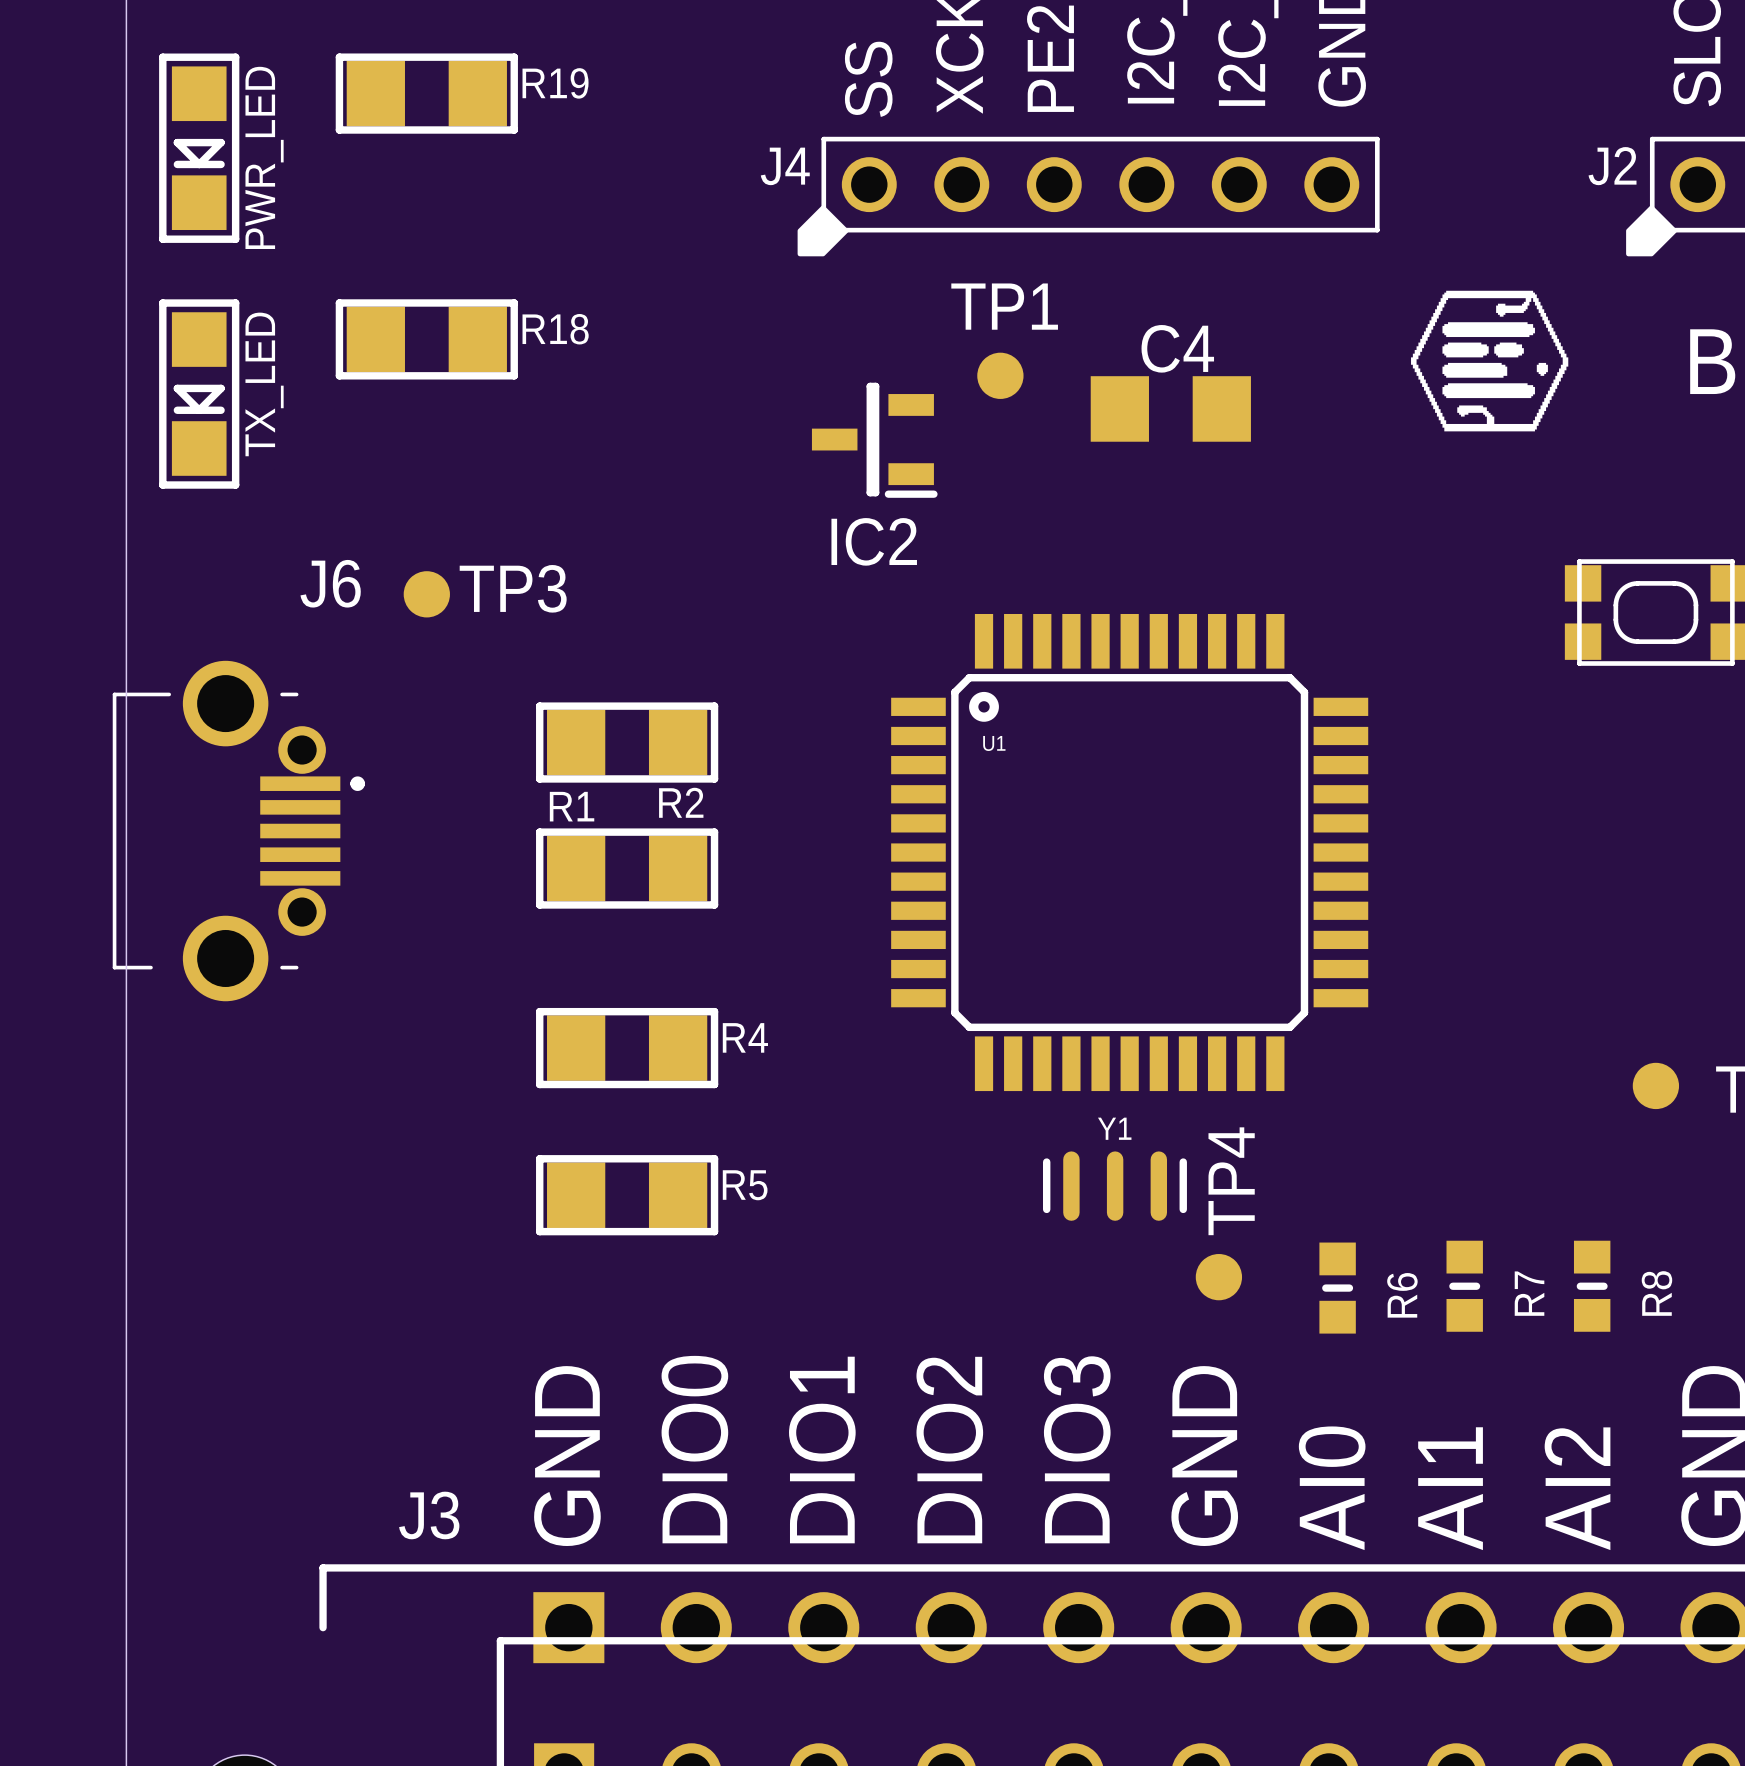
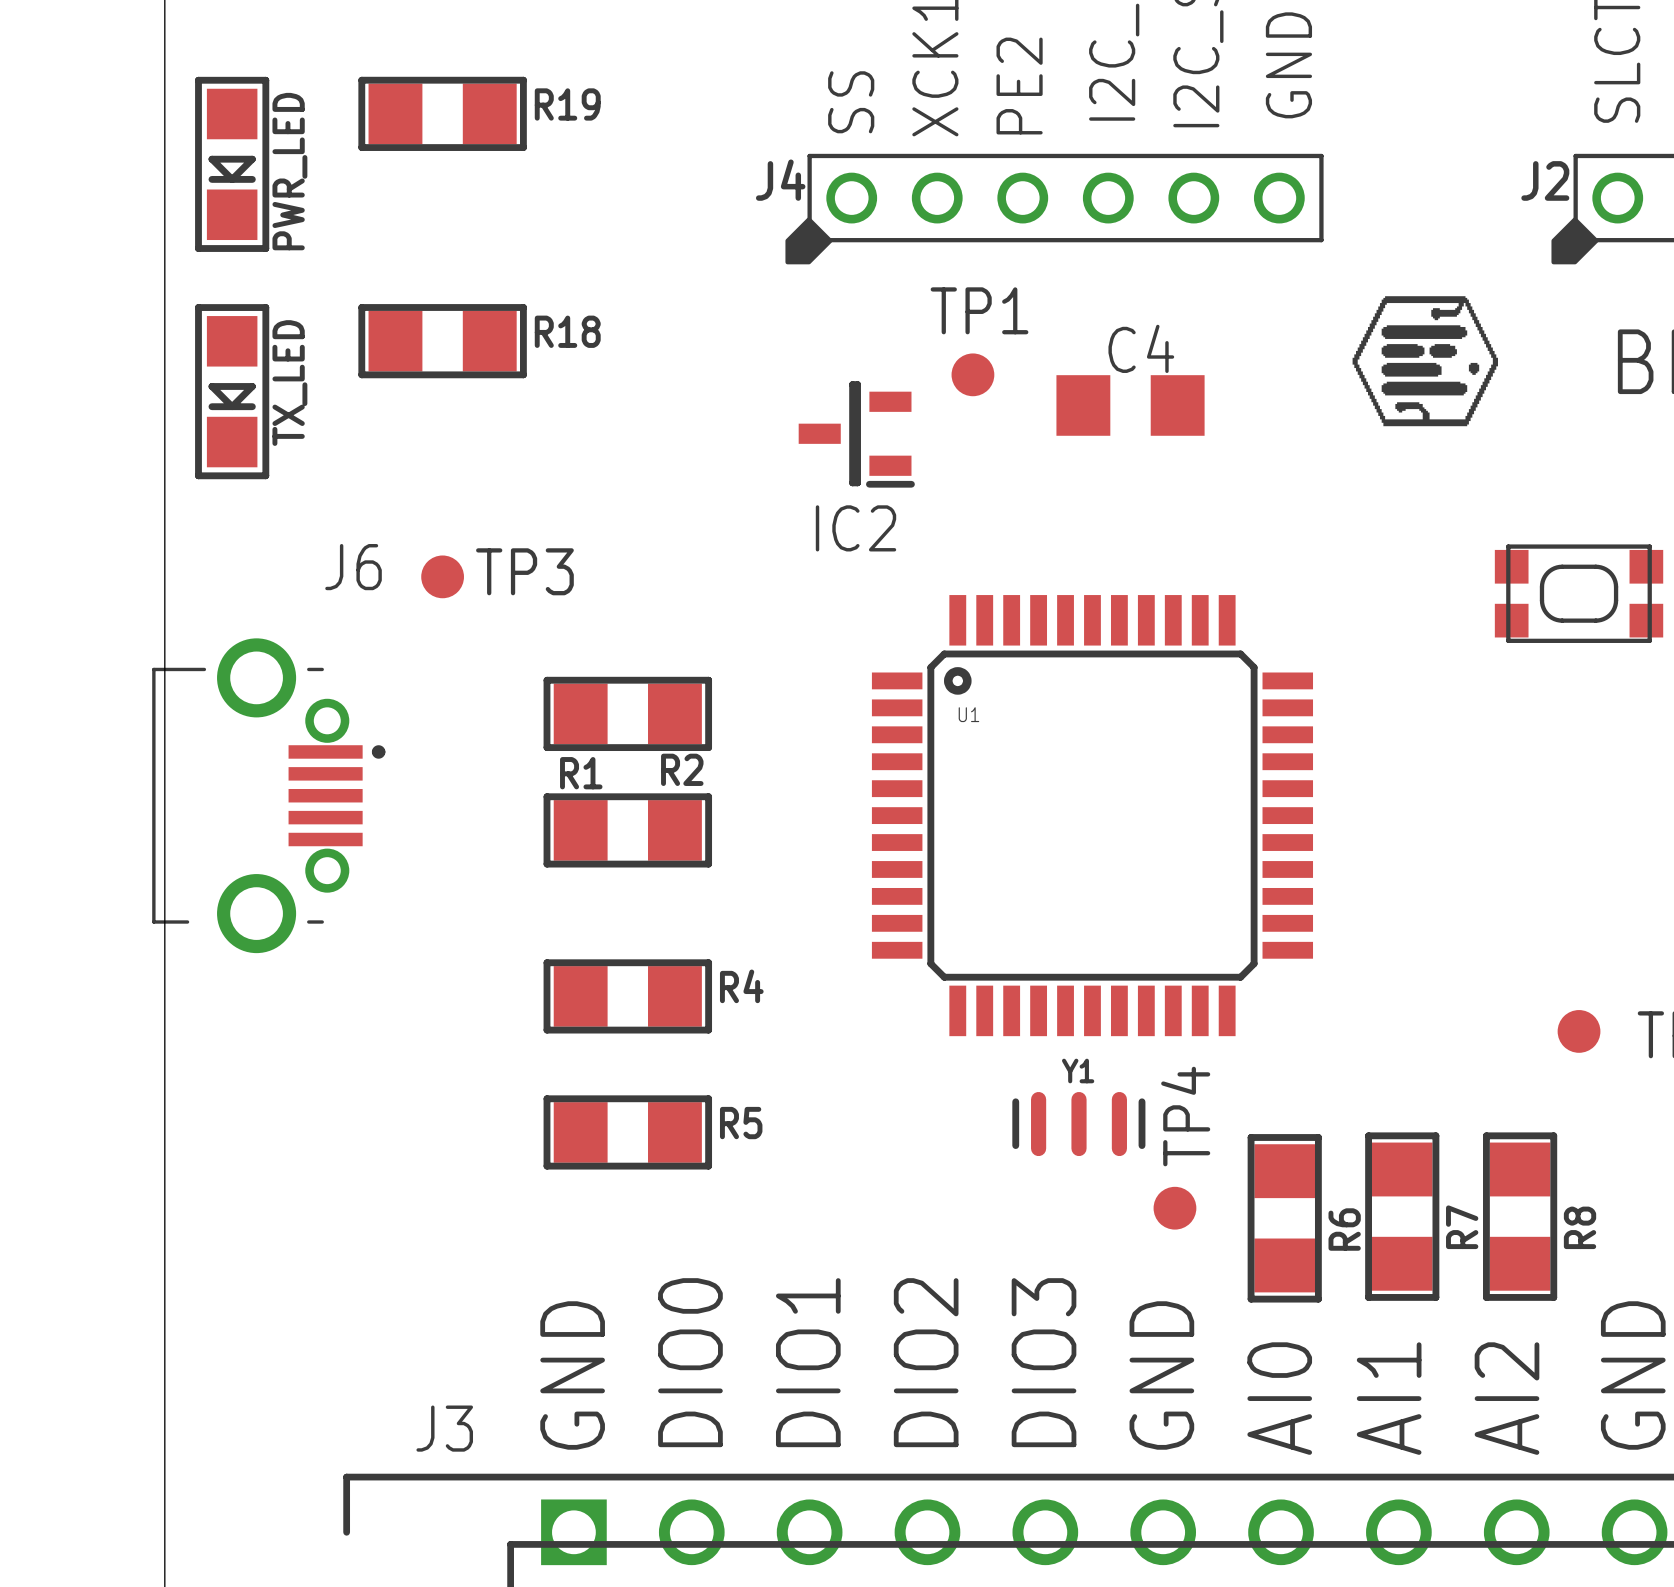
R7 footprint: [1446, 1240, 1483, 1332] -> [1365, 1132, 1440, 1301]
R8 footprint: [1573, 1240, 1611, 1332] -> [1483, 1132, 1558, 1301]
R6 footprint: [1319, 1242, 1356, 1334] -> [1247, 1134, 1322, 1303]

